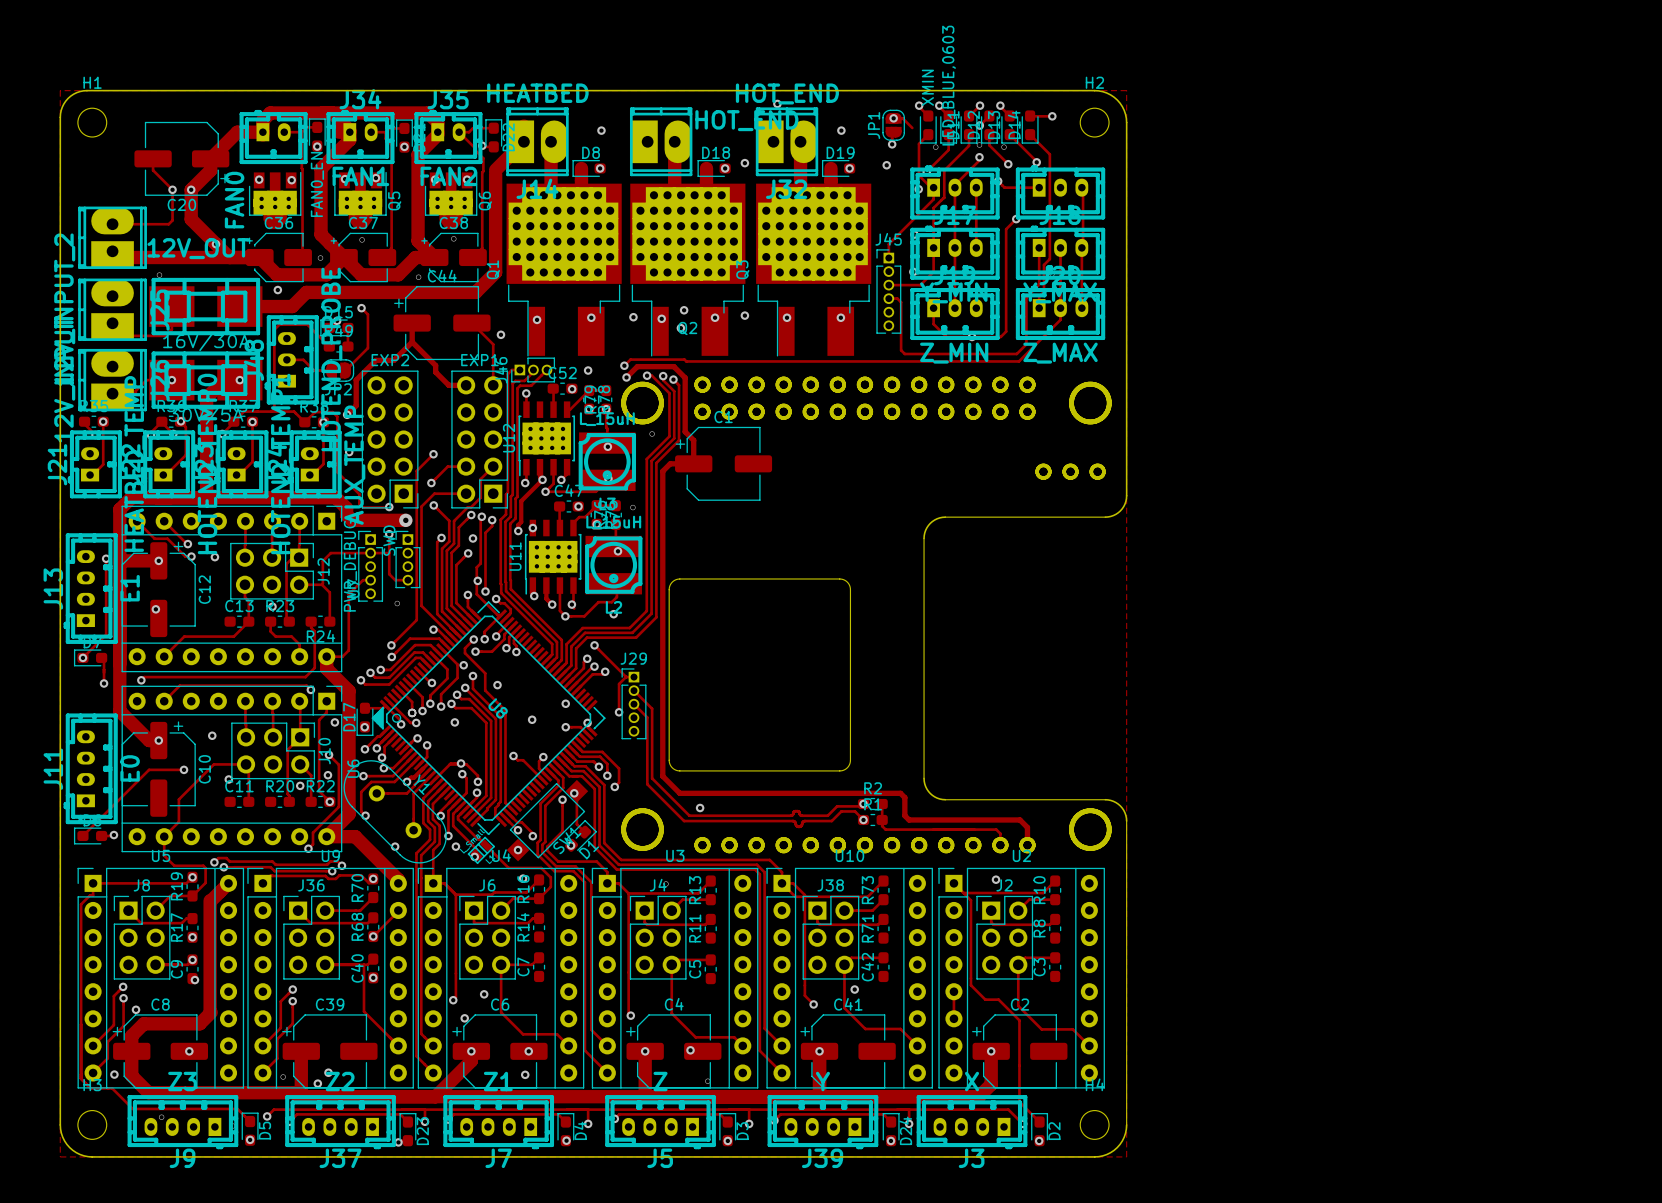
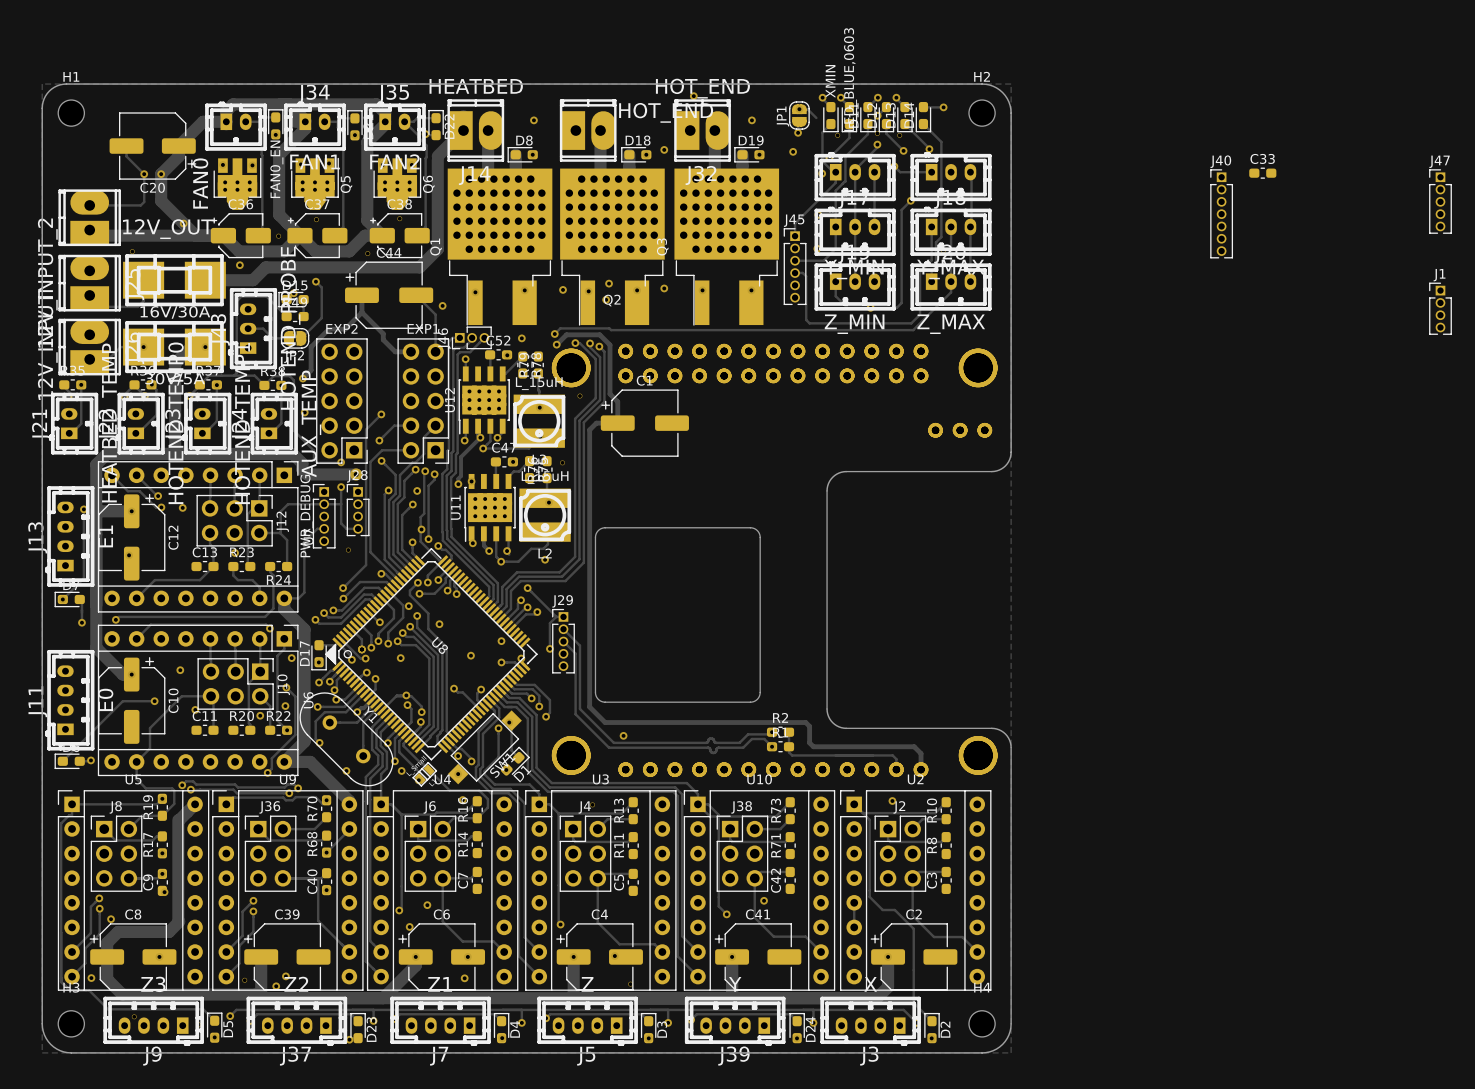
C33: none -> (1262, 173)
J47: none -> (1440, 201)
J40: none -> (1221, 213)
J1: none -> (1440, 308)
J28 name: none -> J28 (357, 476)
J28 value: SWD (389, 540) -> none

